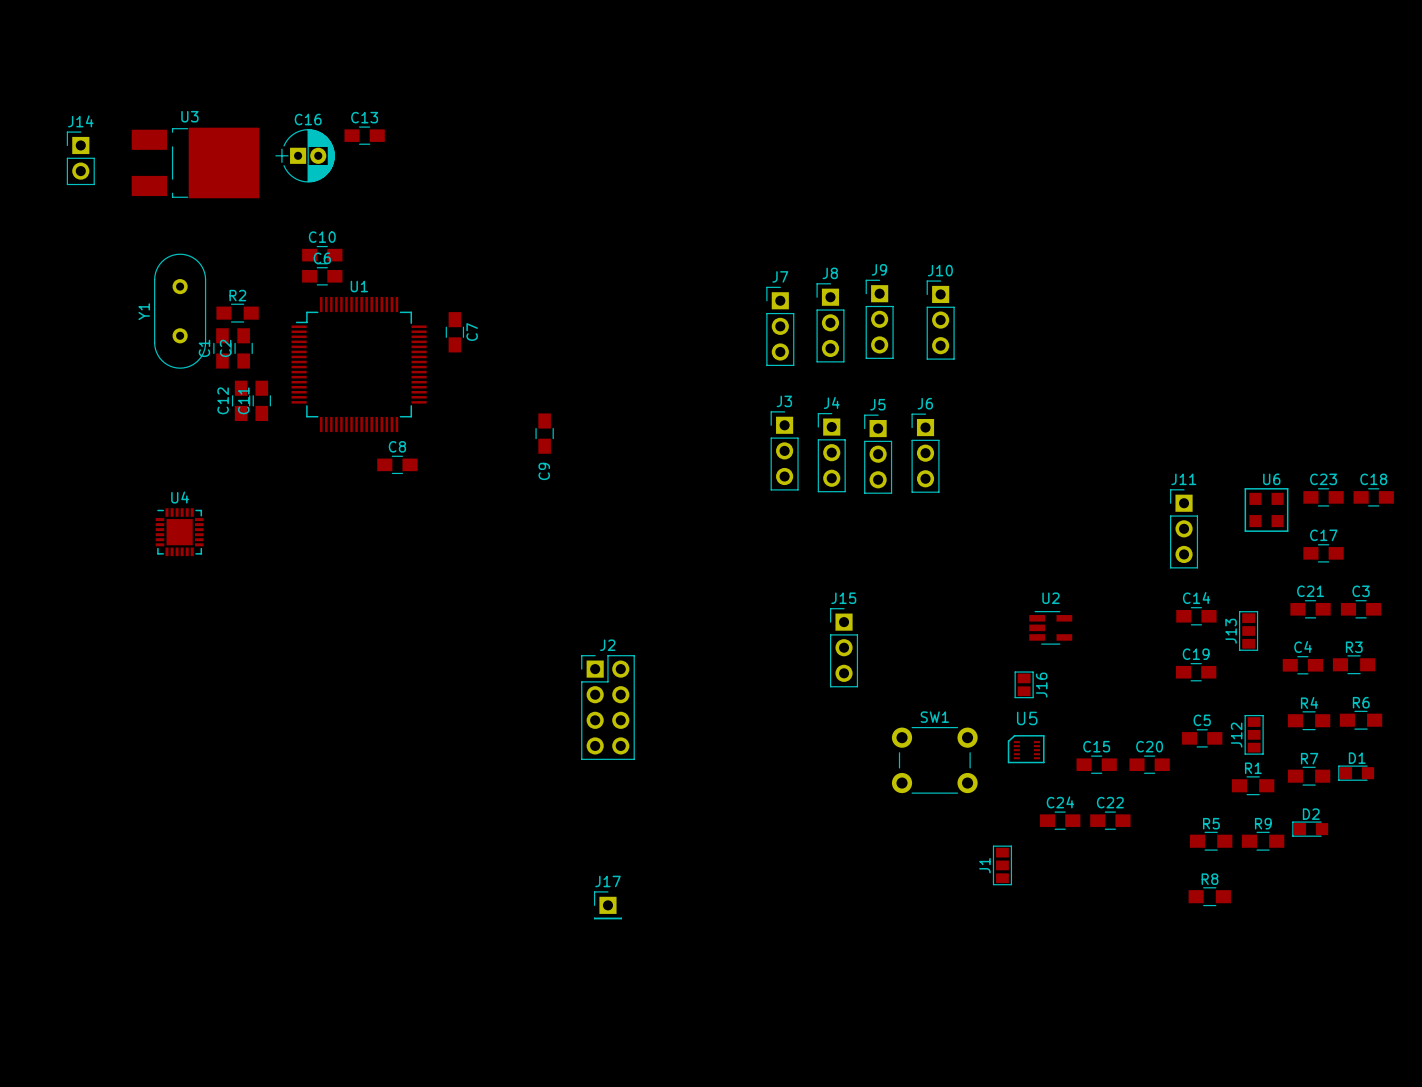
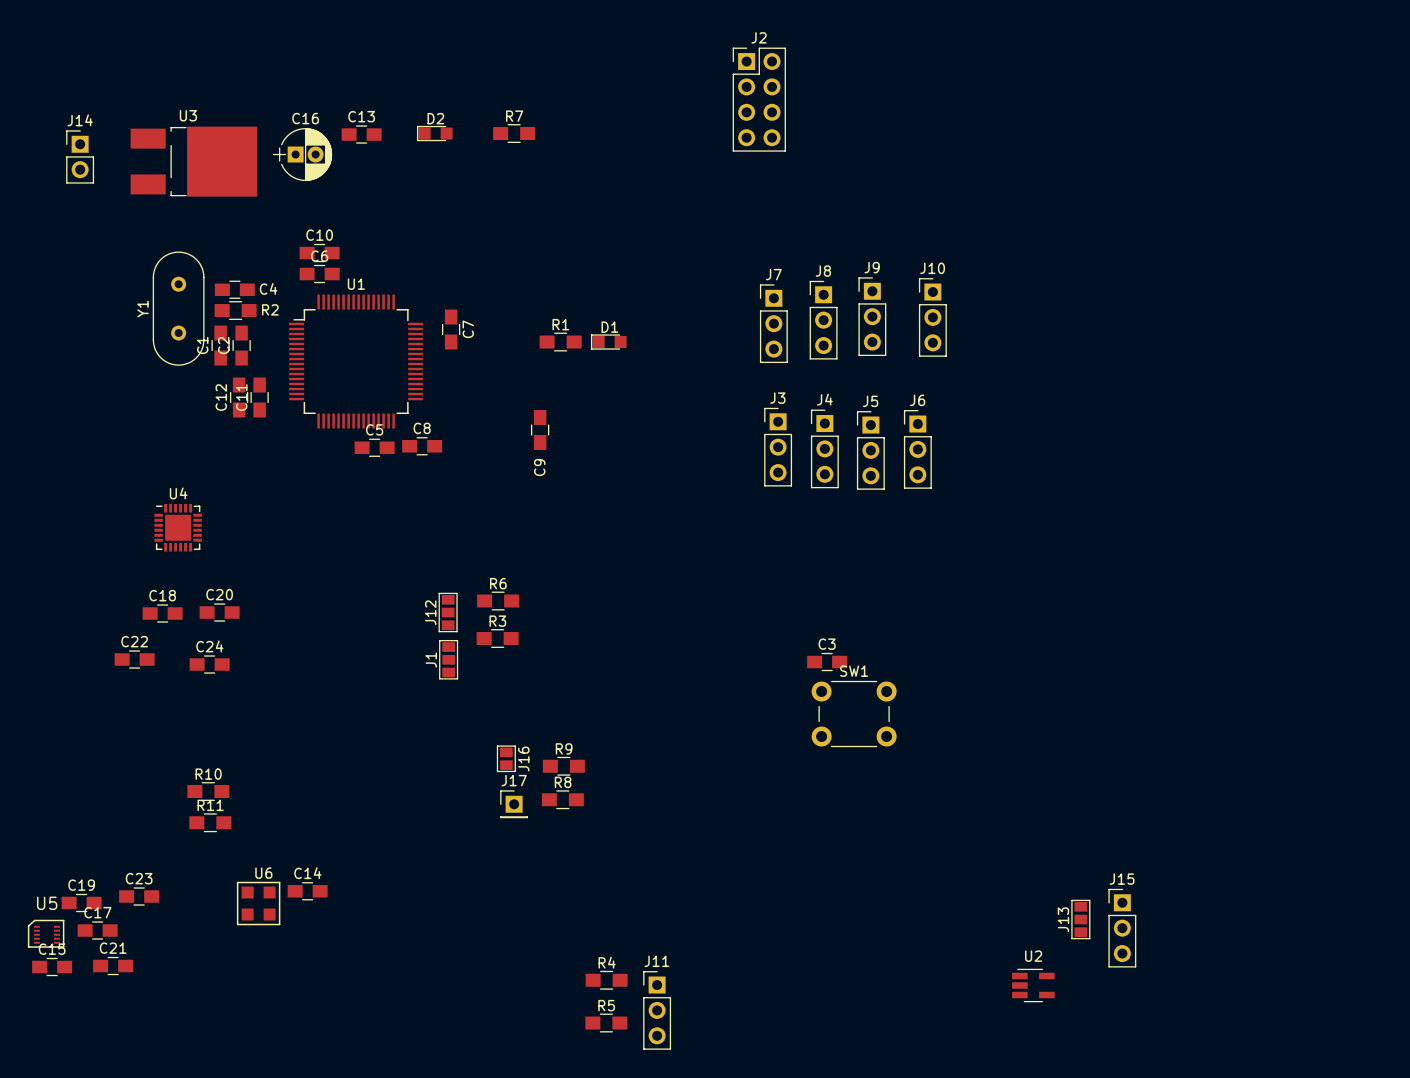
R2 name position: R2 (237, 295) -> R2 (270, 309)
C8 position: (397, 464) -> (422, 446)
C23 position: (1323, 497) -> (139, 896)
C18 position: (1373, 497) -> (162, 613)
U6 position: (1266, 509) -> (258, 903)
J11 position: (1184, 528) -> (657, 1010)
C17 position: (1323, 553) -> (97, 930)
C21 position: (1310, 609) -> (113, 966)
C3 position: (1361, 609) -> (827, 662)
C14 position: (1196, 616) -> (307, 891)
U2 position: (1050, 627) -> (1033, 985)
J13 position: (1248, 630) -> (1080, 919)
J15 position: (844, 647) -> (1122, 928)
C4 name position: C4 (1303, 647) -> C4 (268, 288)
R3 position: (1354, 664) -> (497, 638)
C4 position: (1302, 665) -> (234, 289)
C19 position: (1196, 672) -> (81, 903)
J16 position: (1024, 684) -> (506, 758)
J2 position: (607, 707) -> (759, 99)
R4 position: (1309, 720) -> (606, 980)
R6 position: (1361, 720) -> (498, 601)
J12 position: (1254, 734) -> (448, 612)
C5 position: (1202, 738) -> (374, 447)
U5 position: (1026, 749) -> (46, 933)
SW1 position: (934, 760) -> (854, 714)
C15 position: (1096, 764) -> (52, 967)
C20 position: (1149, 764) -> (219, 612)
D1 position: (1356, 773) -> (608, 342)
R7 position: (1309, 776) -> (514, 133)
R1 position: (1253, 785) -> (560, 342)
R10: none -> (208, 791)
C24 position: (1060, 820) -> (209, 664)
C22 position: (1110, 820) -> (134, 659)
R11: none -> (210, 822)
D2 position: (1310, 829) -> (434, 133)
R5 position: (1211, 841) -> (606, 1023)
R9 position: (1263, 841) -> (563, 766)
J1 position: (1002, 865) -> (448, 659)
R8 position: (1209, 896) -> (562, 799)
J17 position: (607, 905) -> (514, 804)

